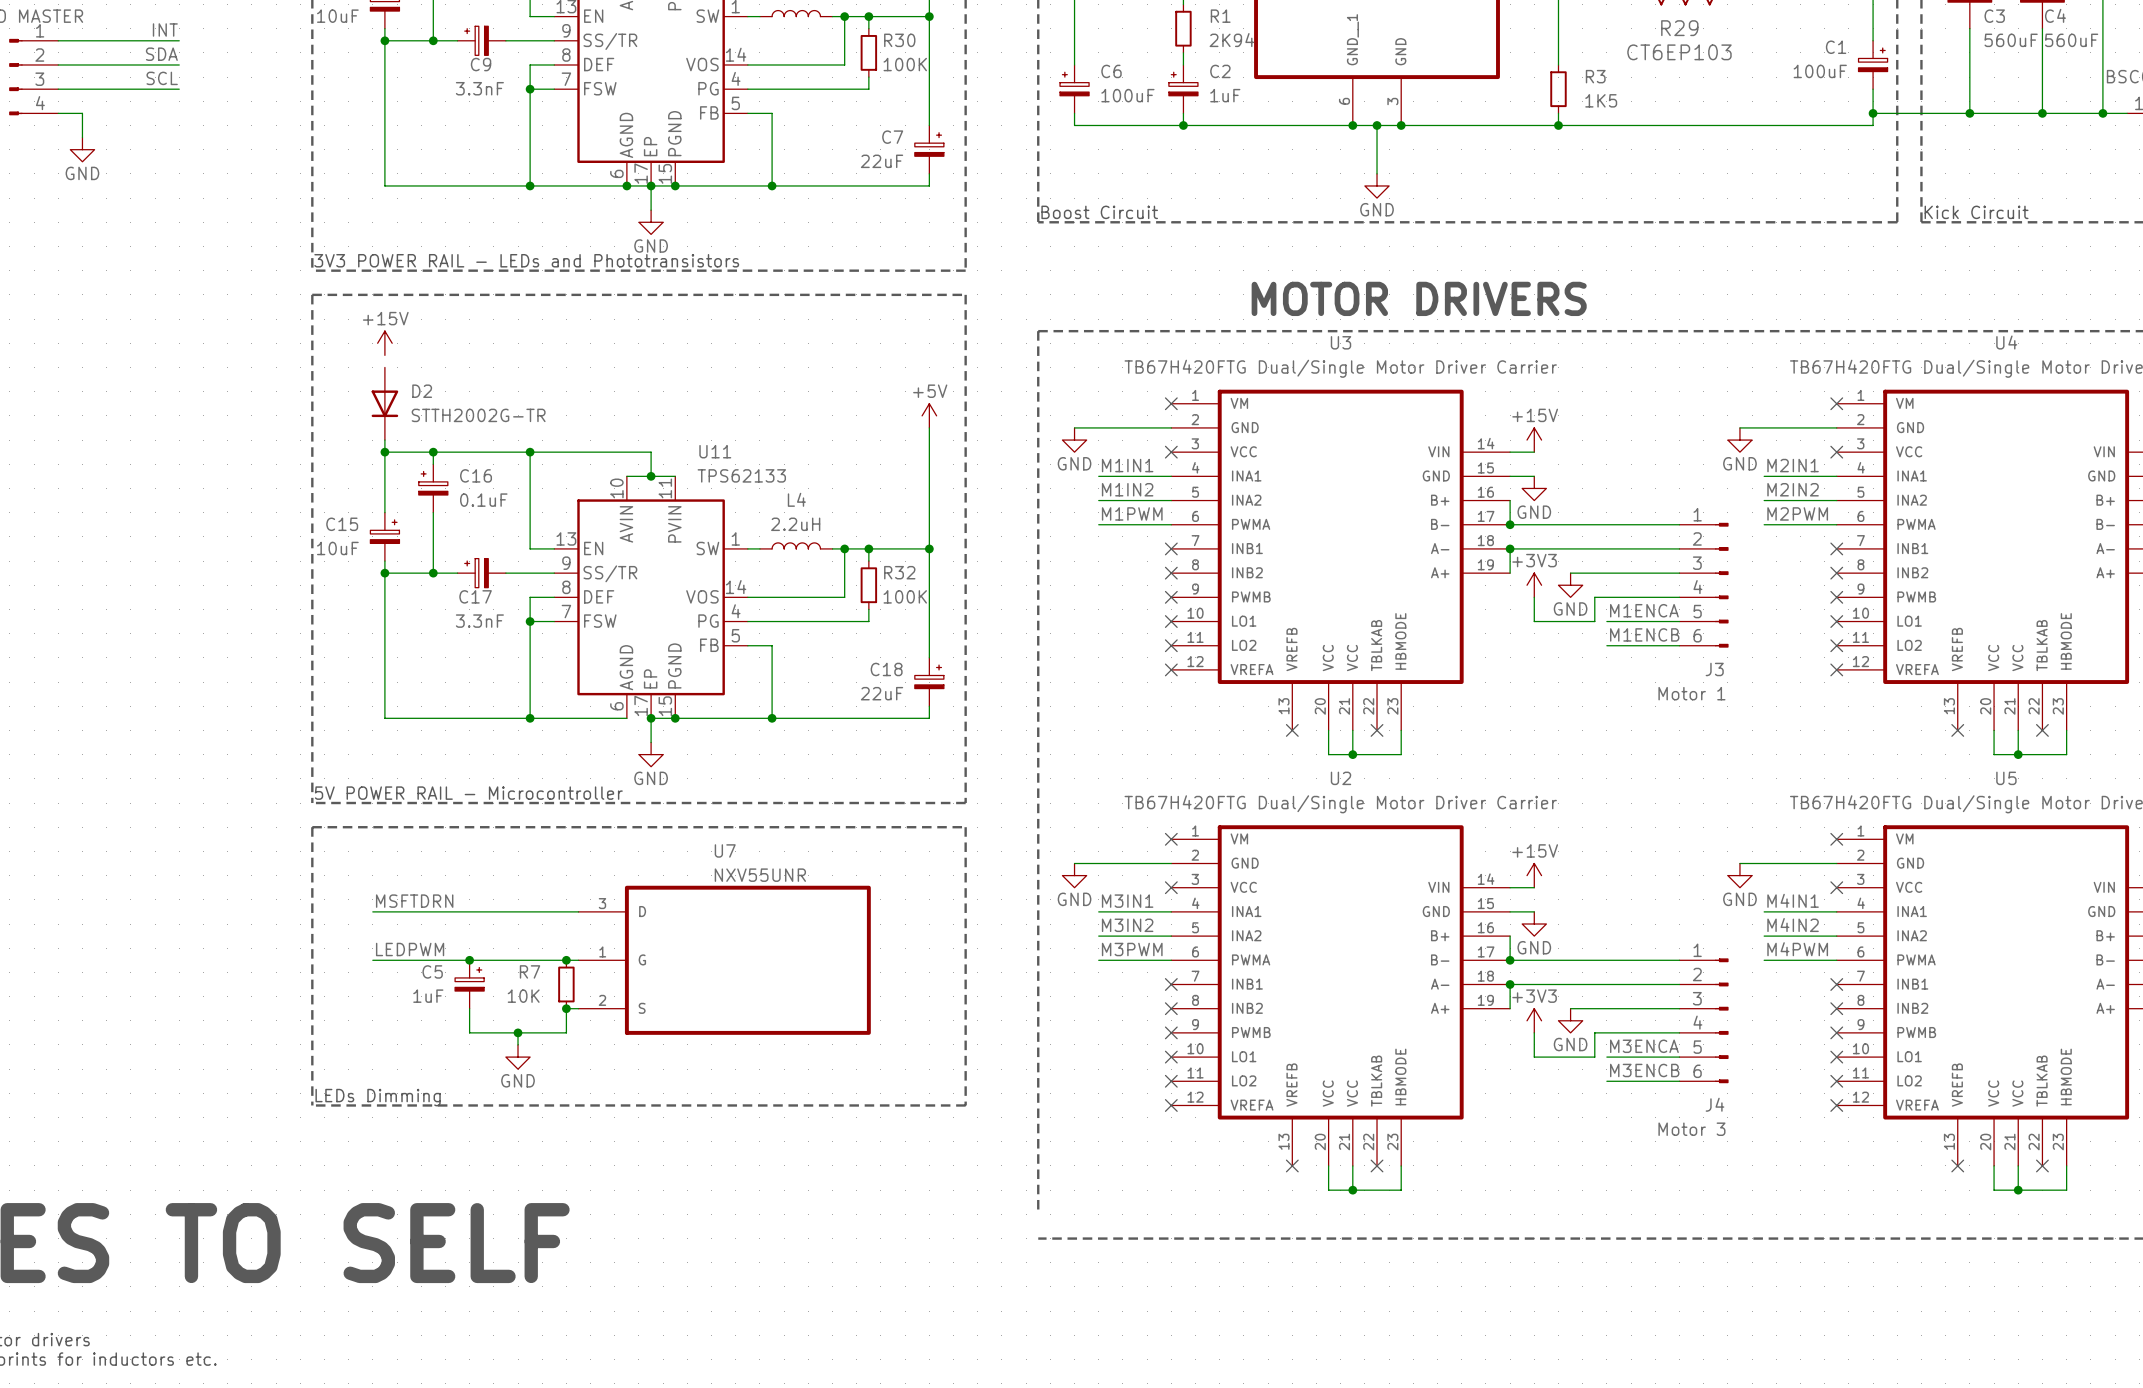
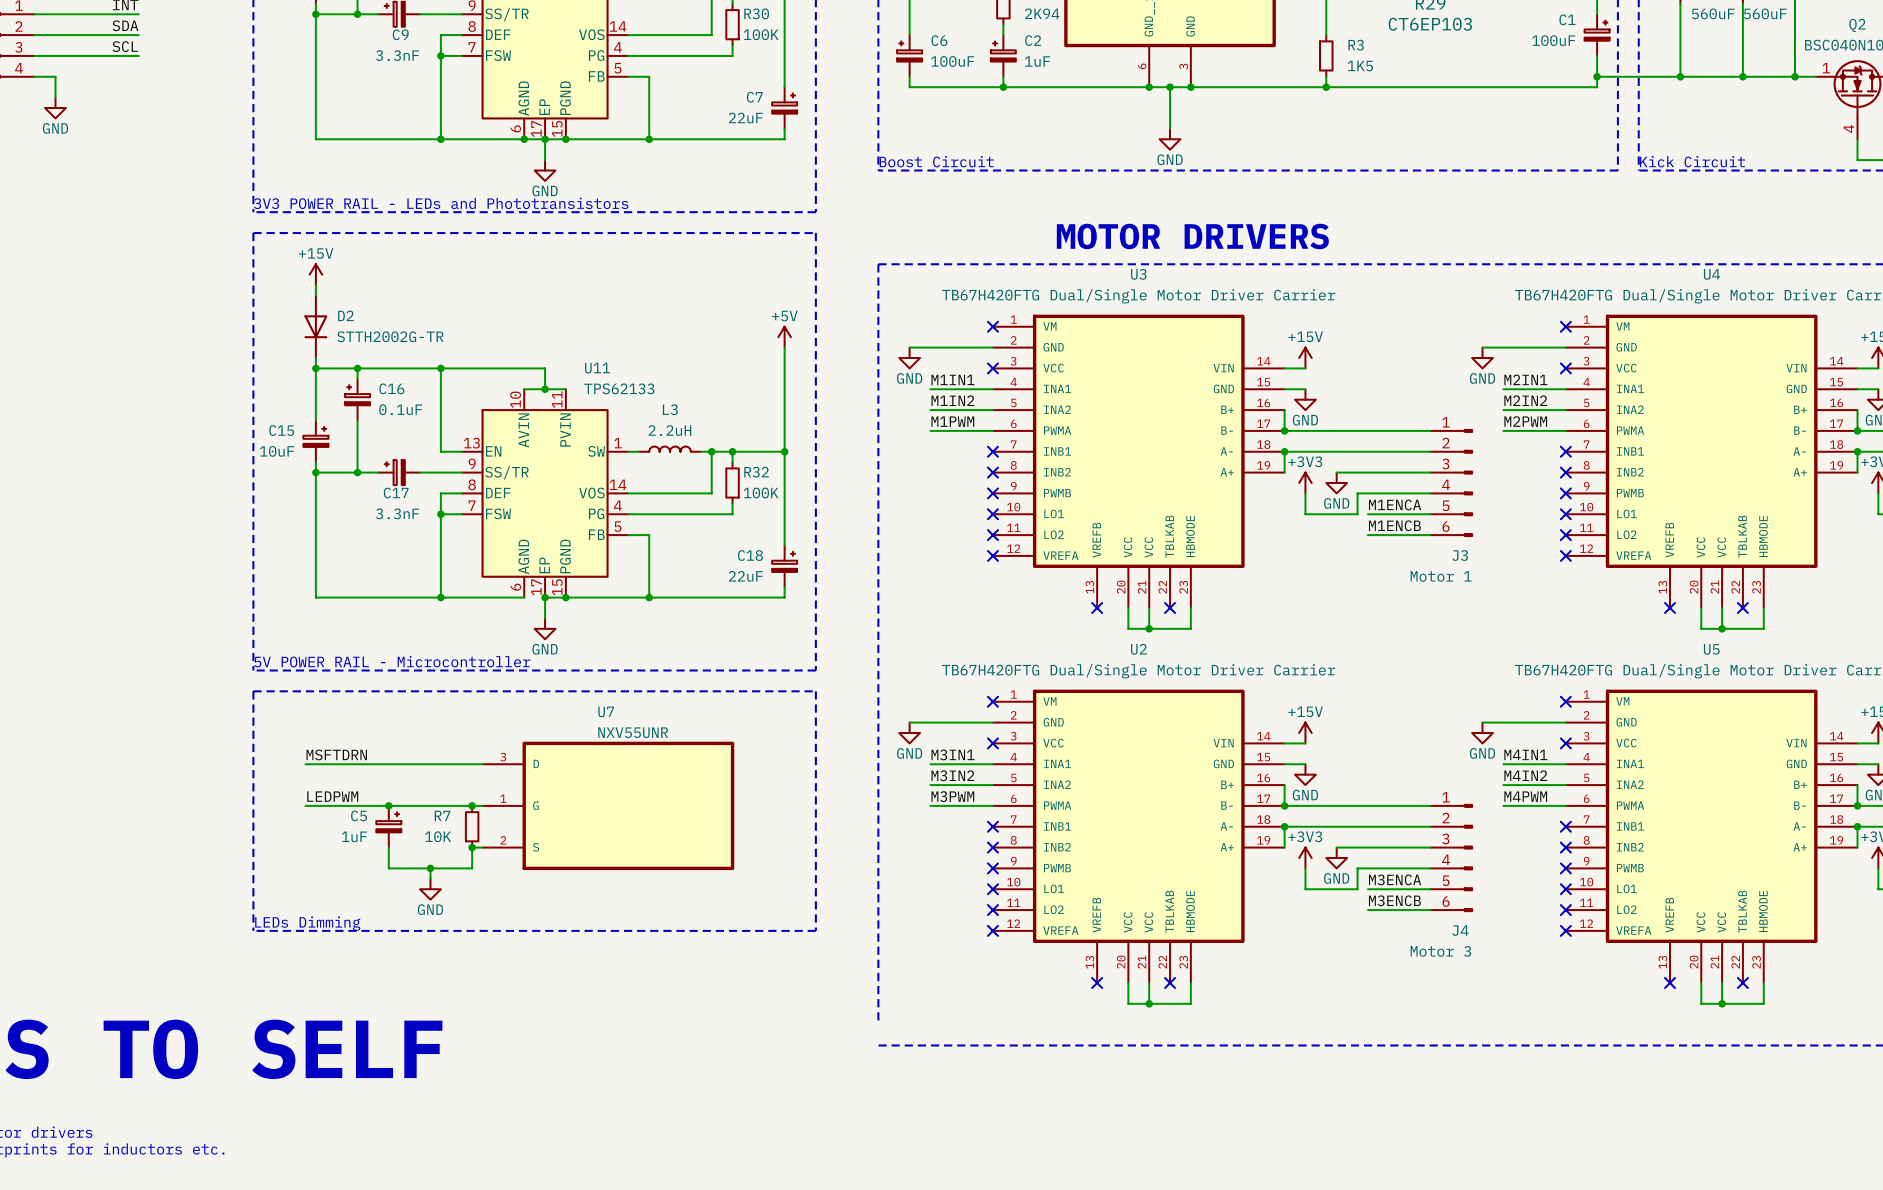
wire: none -> (315, 285) (315, 295)
L4 name: L4 (796, 499) -> L3 (670, 409)

